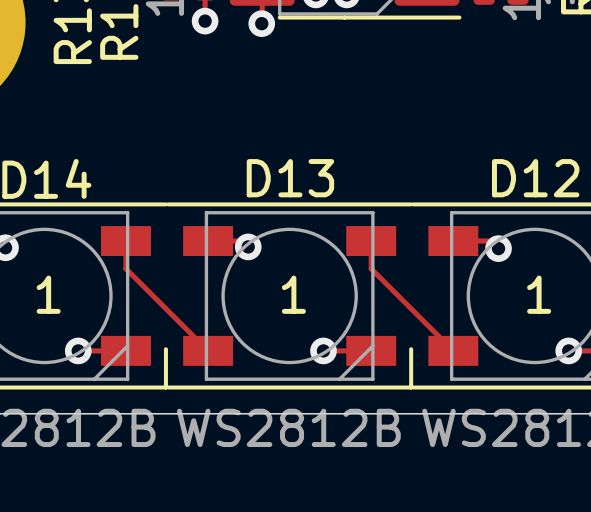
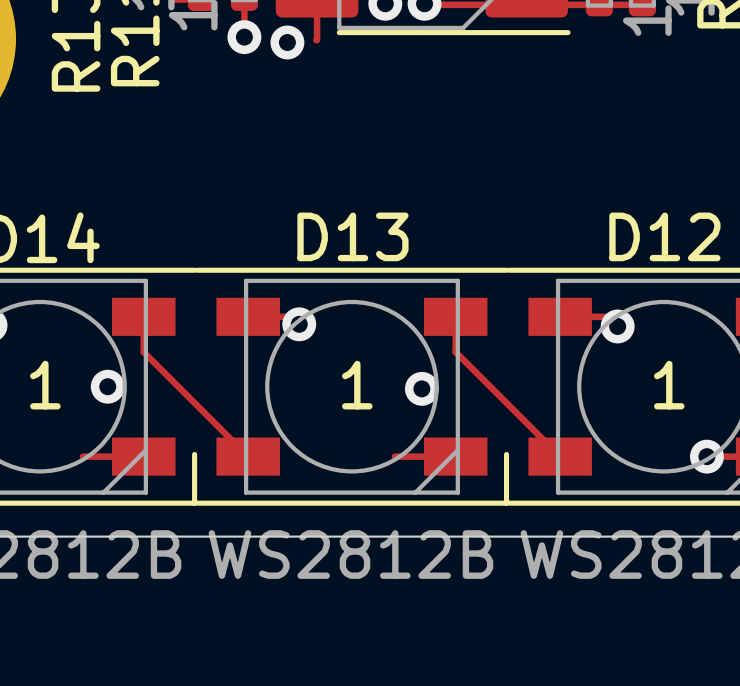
via position: (261, 23) -> (287, 42)
via position: (78, 350) -> (107, 386)
via position: (323, 350) -> (421, 388)

